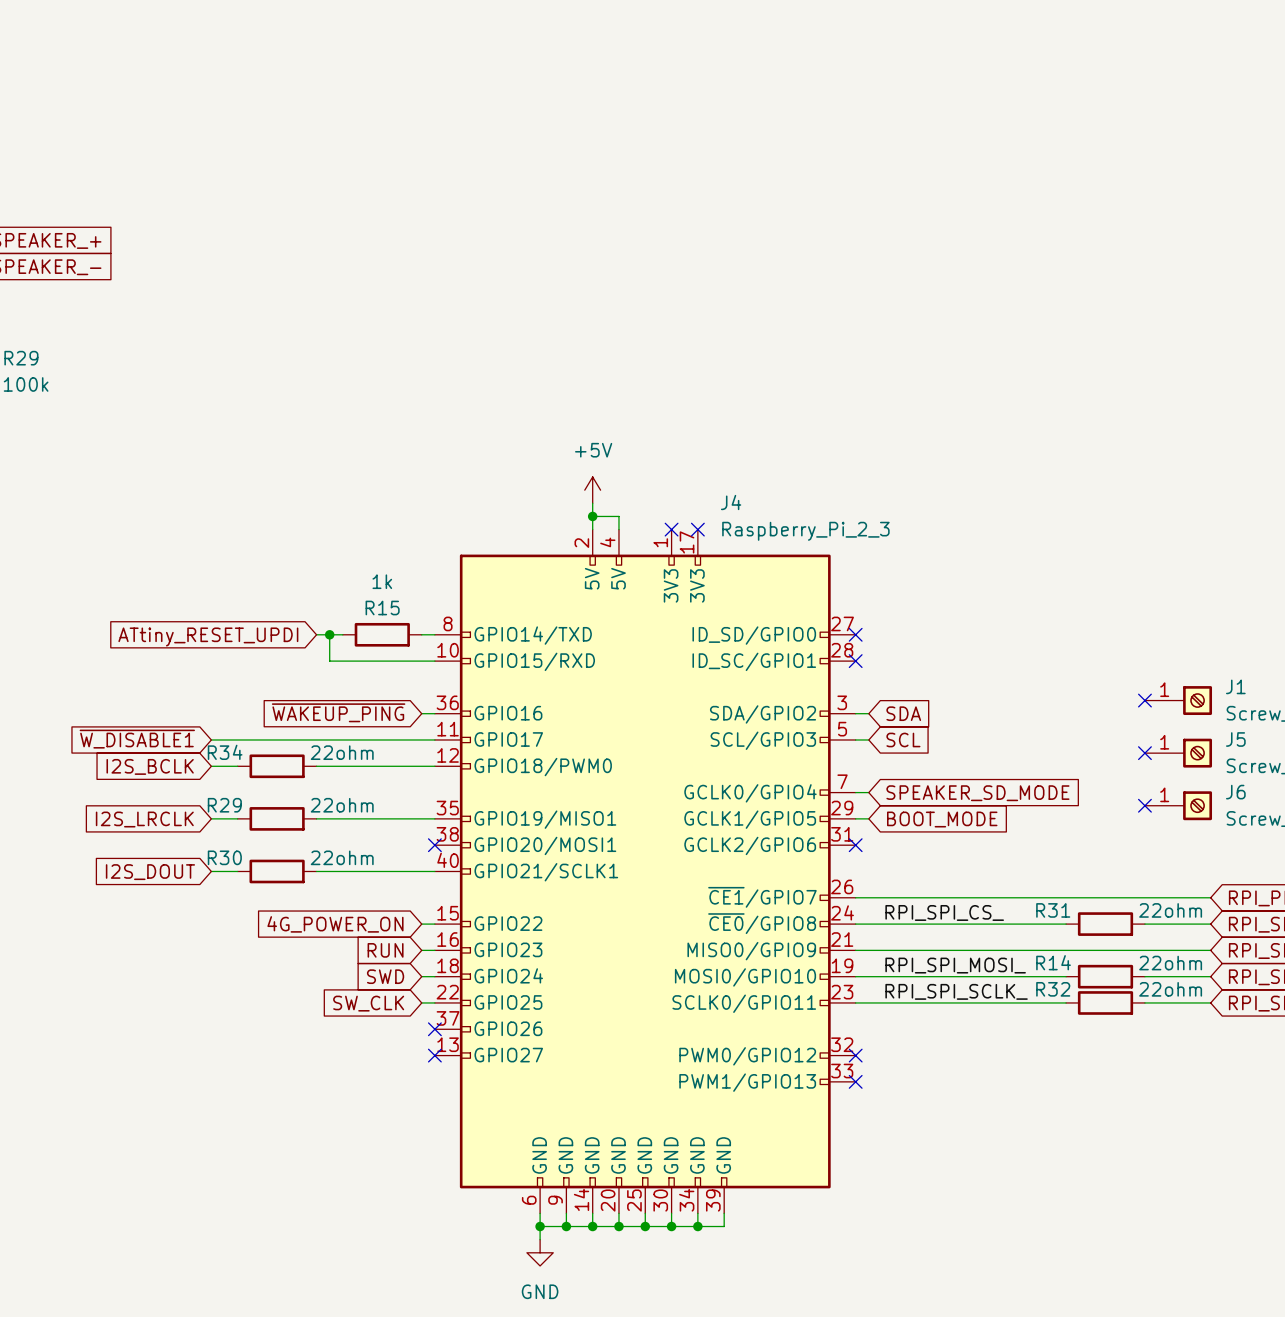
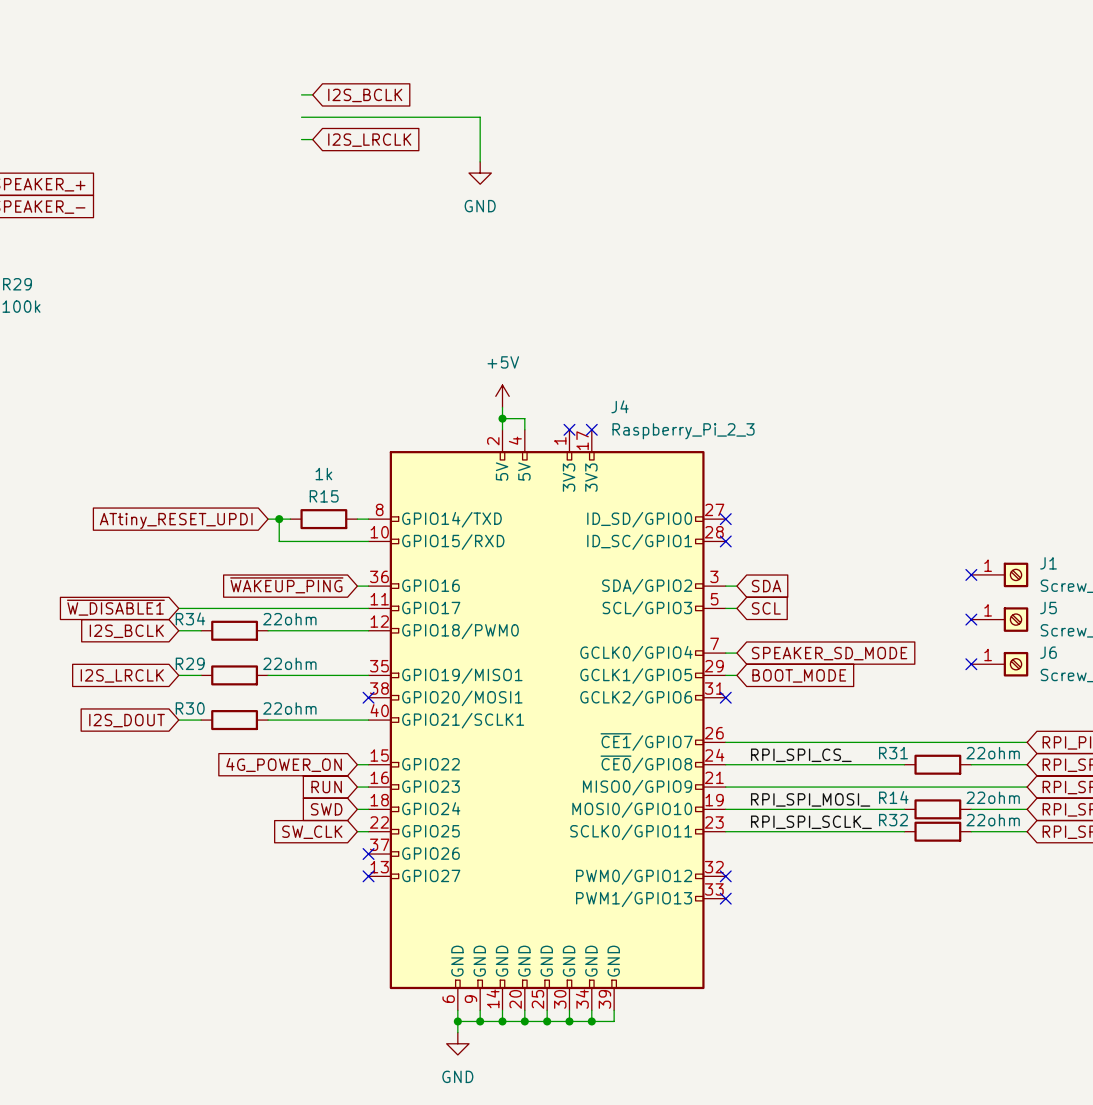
wire: none -> (301, 94) (312, 94)
global label: none -> I2S_BCLK (365, 95)
wire: none -> (301, 117) (480, 117) (480, 161)
wire: none -> (301, 139) (312, 139)
global label: none -> I2S_LRCLK (369, 140)
power symbol: none -> GND (480, 173)

